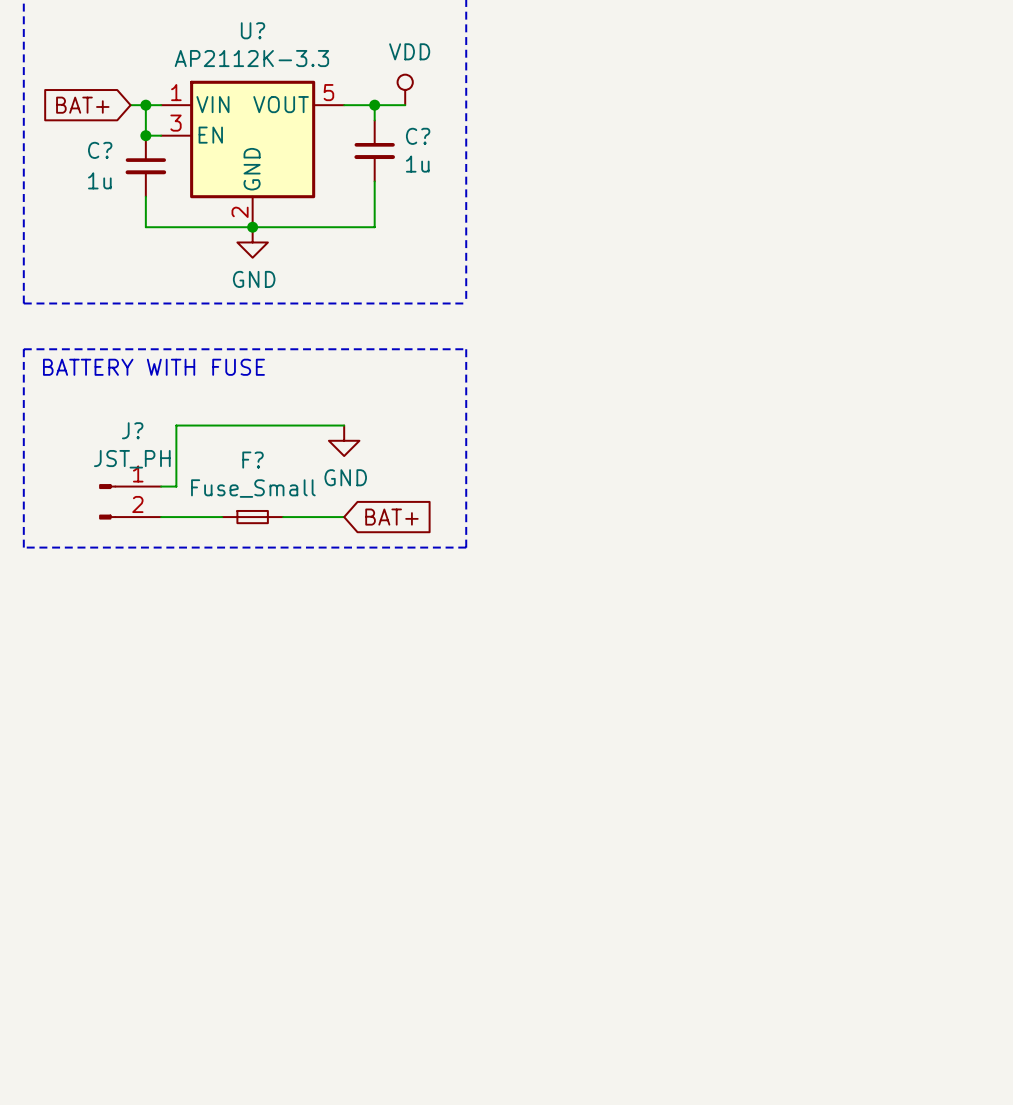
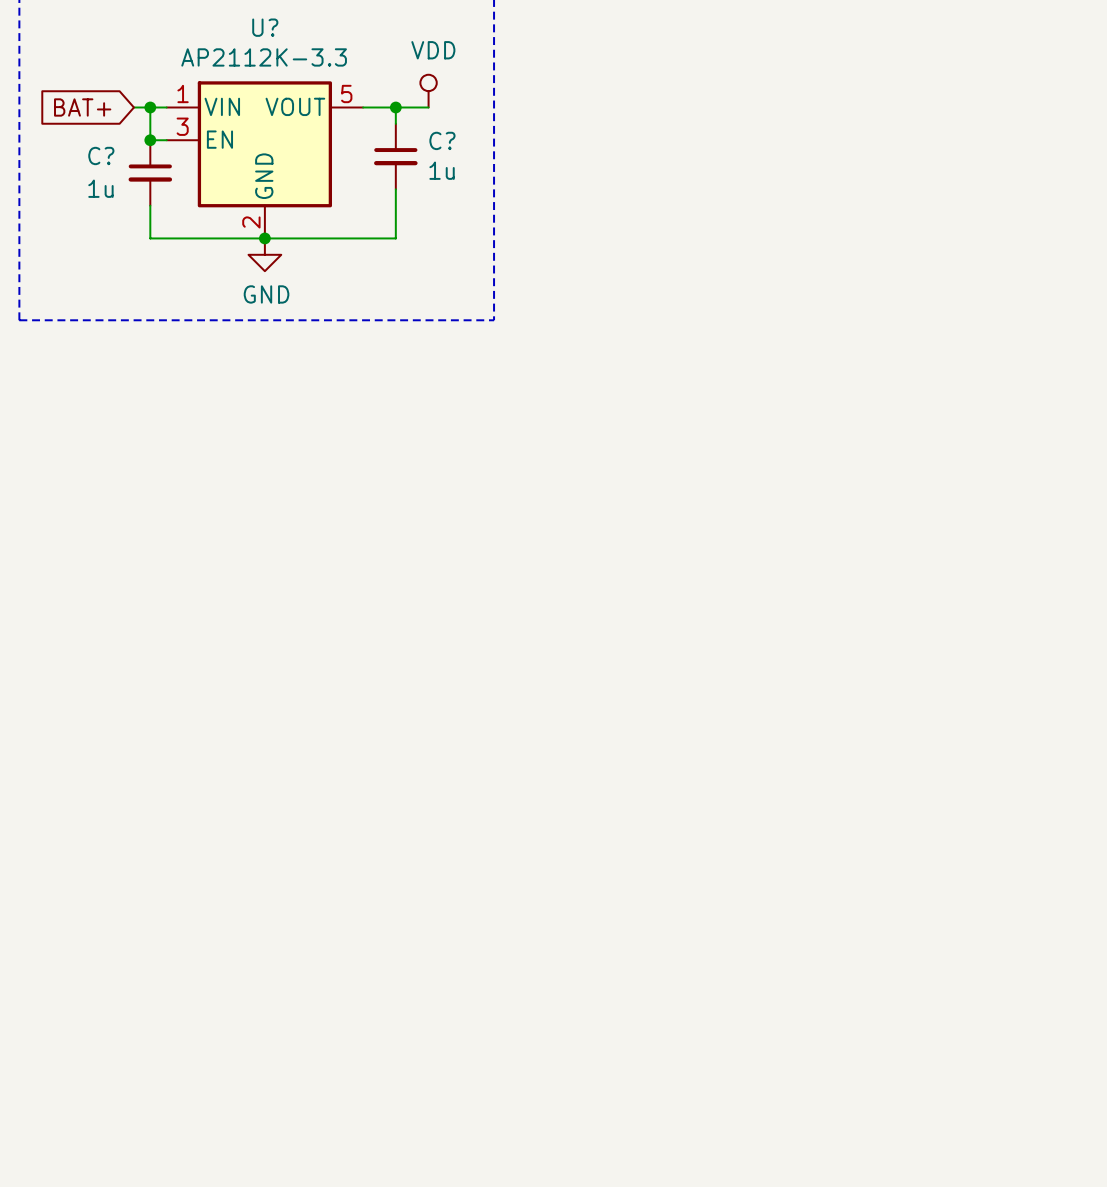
line: (23, 349) (466, 349) (466, 547) (23, 547) (23, 349) -> none
text: BATTERY WITH FUSE (153, 367) -> none
wire: (344, 425) (176, 425) (176, 486) (161, 486) -> none
power symbol: GND (344, 440) -> none
J?: JST_PH (130, 501) -> none
wire: (161, 517) (222, 517) -> none
F?: Fuse_Small (252, 517) -> none
wire: (283, 517) (344, 517) -> none
global label: BAT+ (391, 517) -> none

